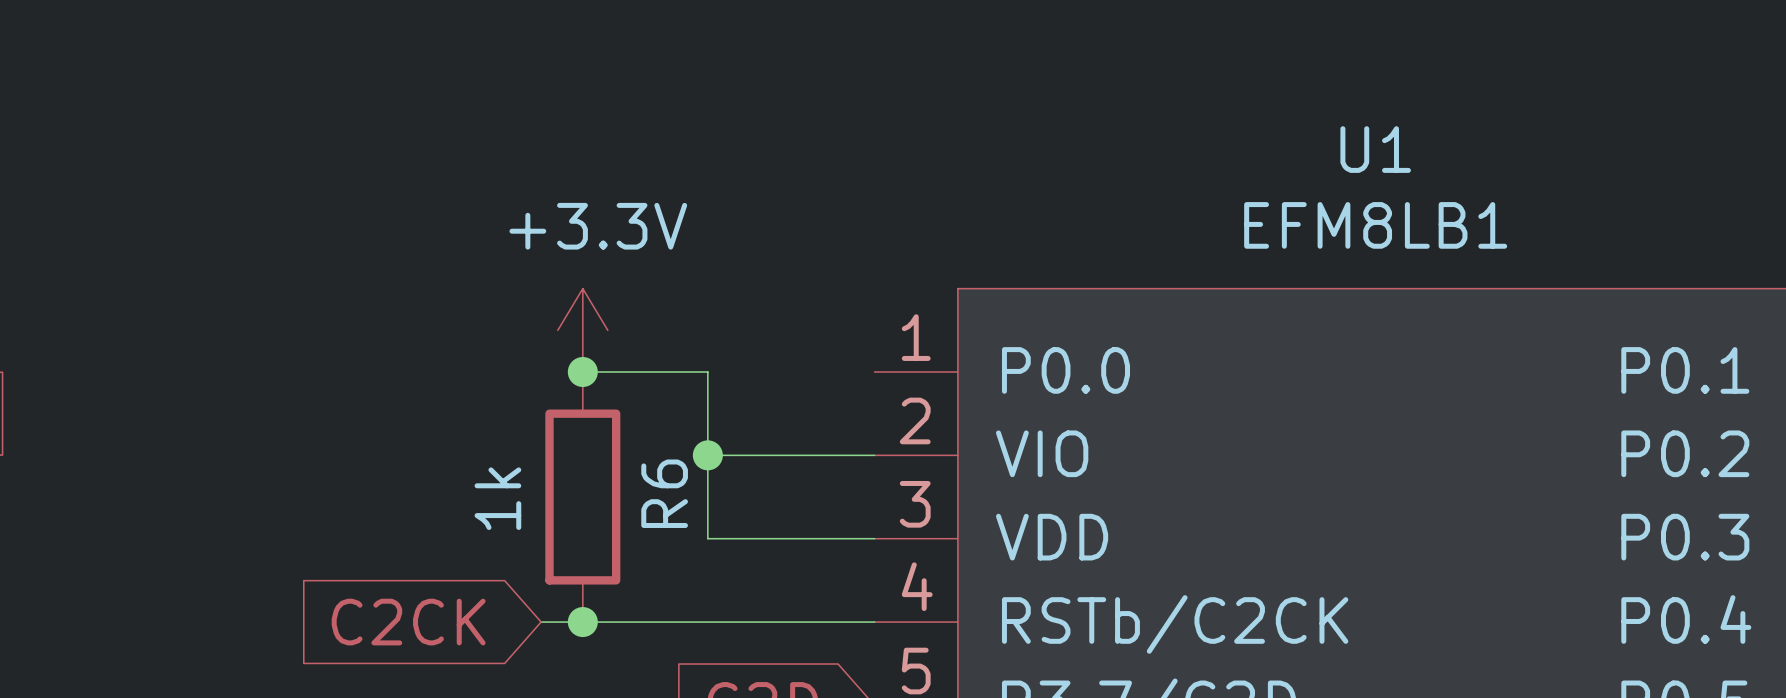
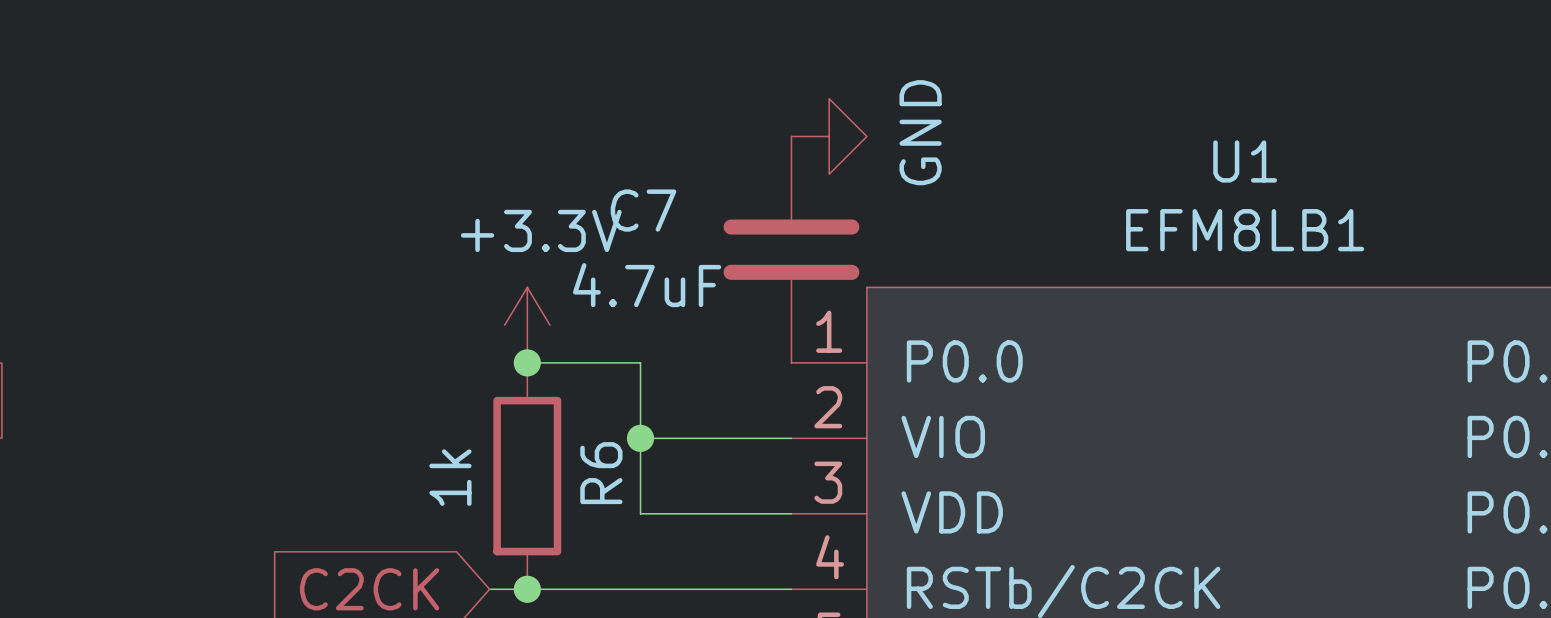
power symbol: none -> GND (829, 136)
C7: none -> 4.7uF (791, 249)

